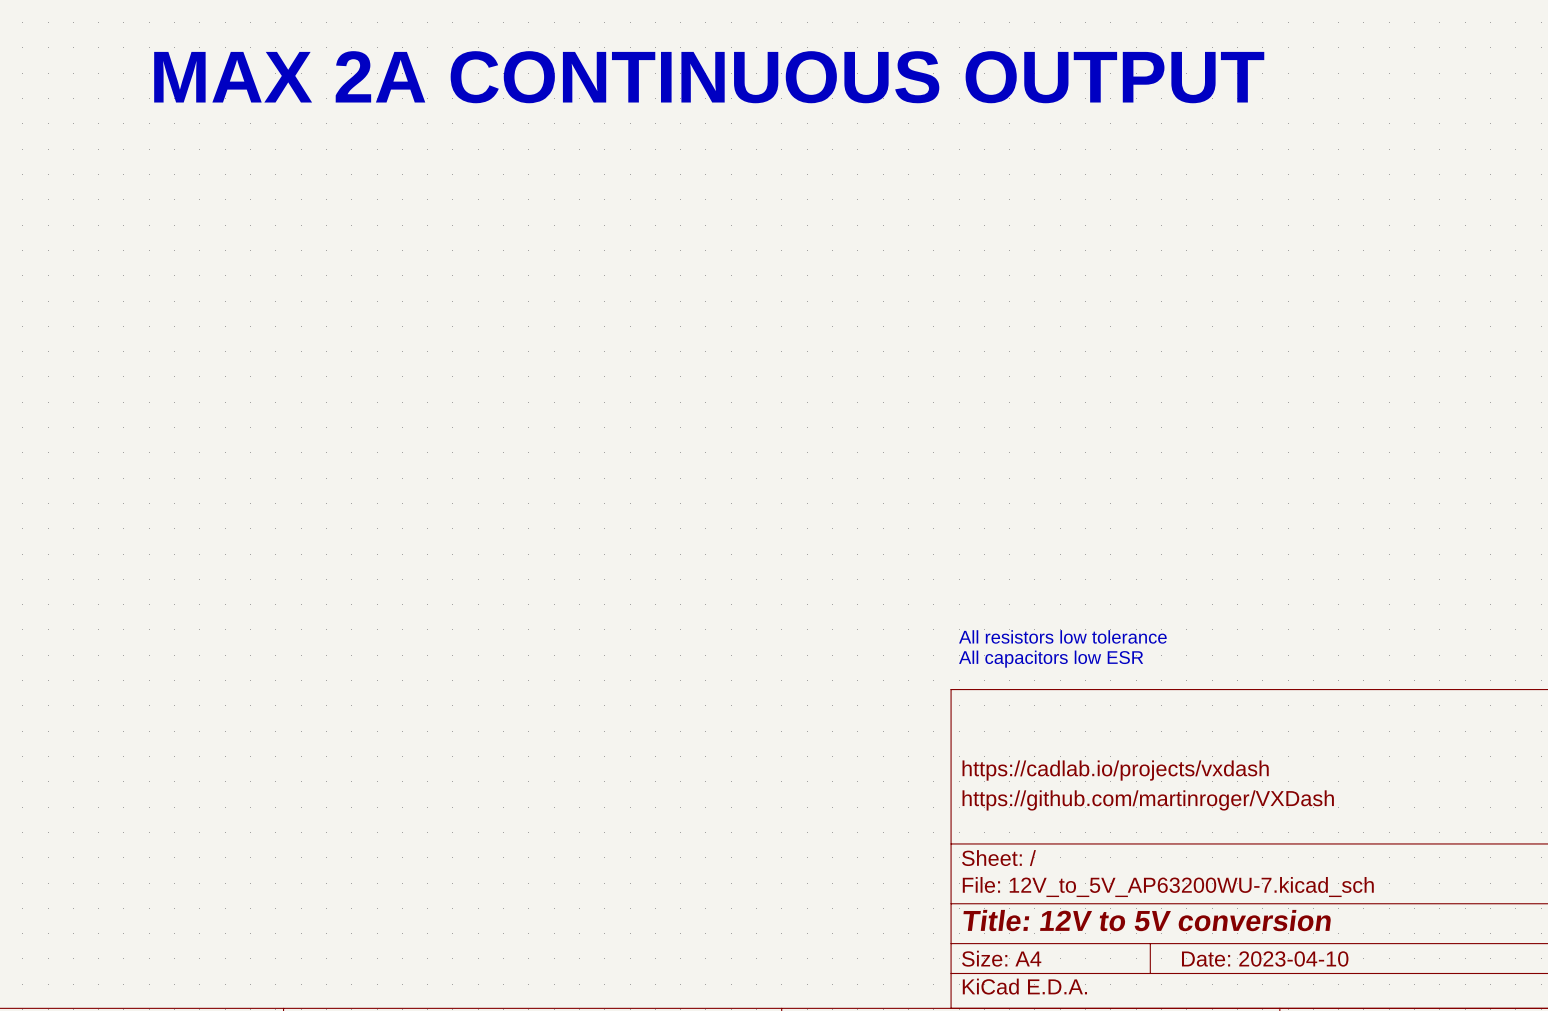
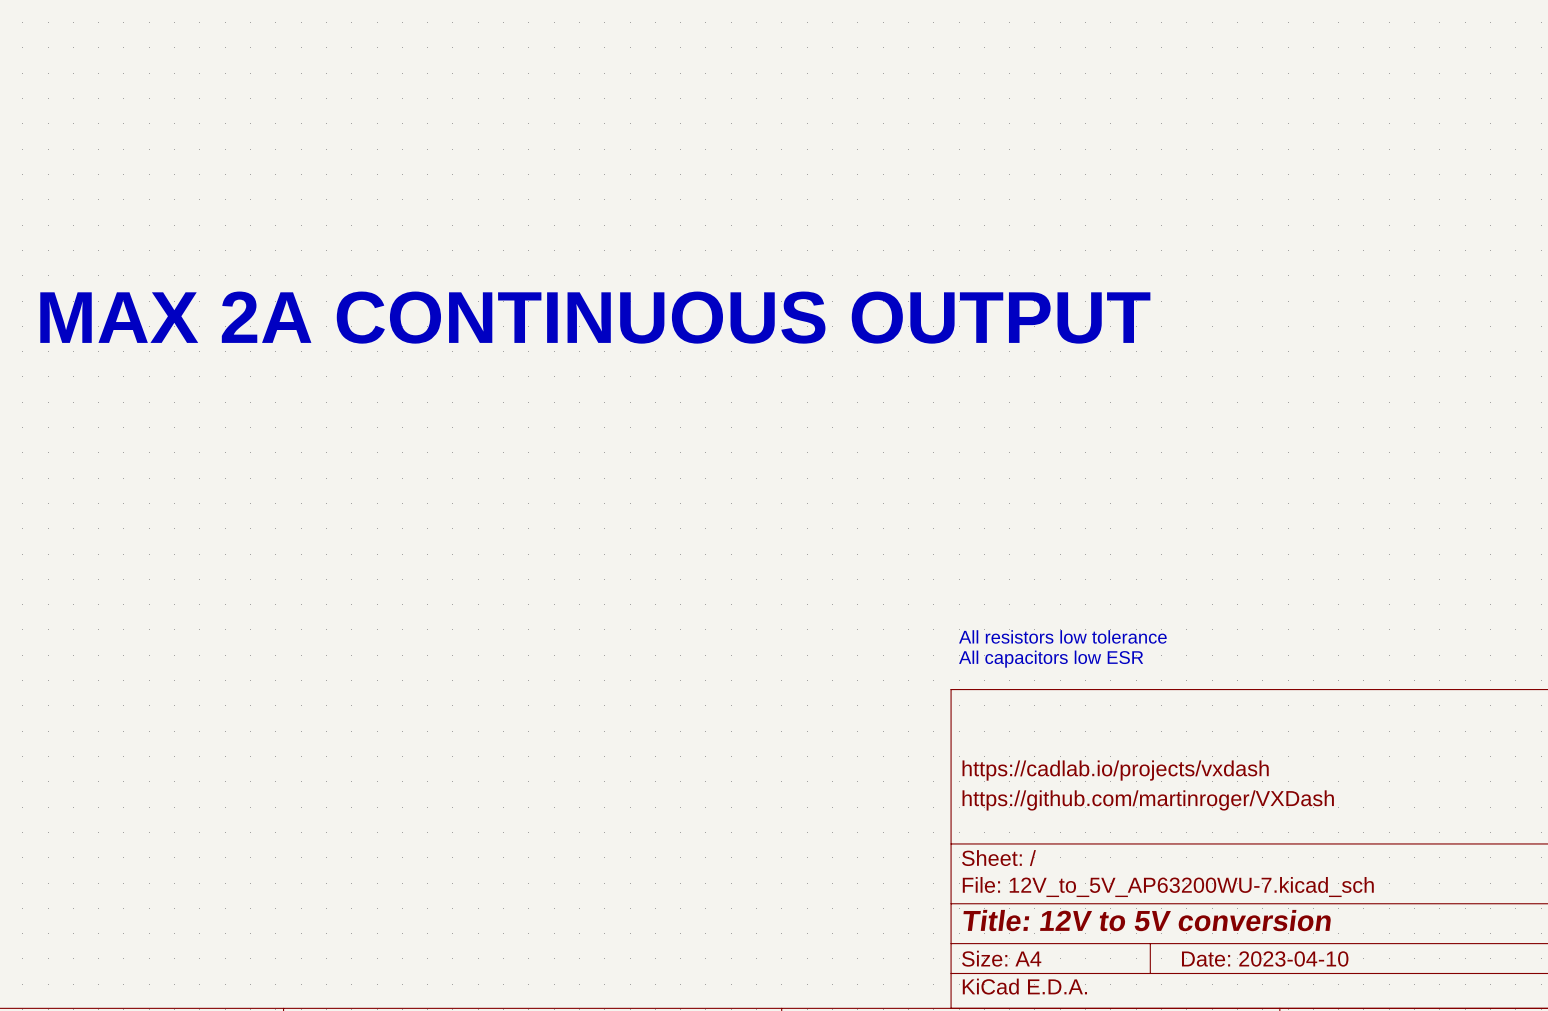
text: MAX 2A CONTINUOUS OUTPUT (709, 77) -> none
text: none -> MAX 2A CONTINUOUS OUTPUT (595, 317)

